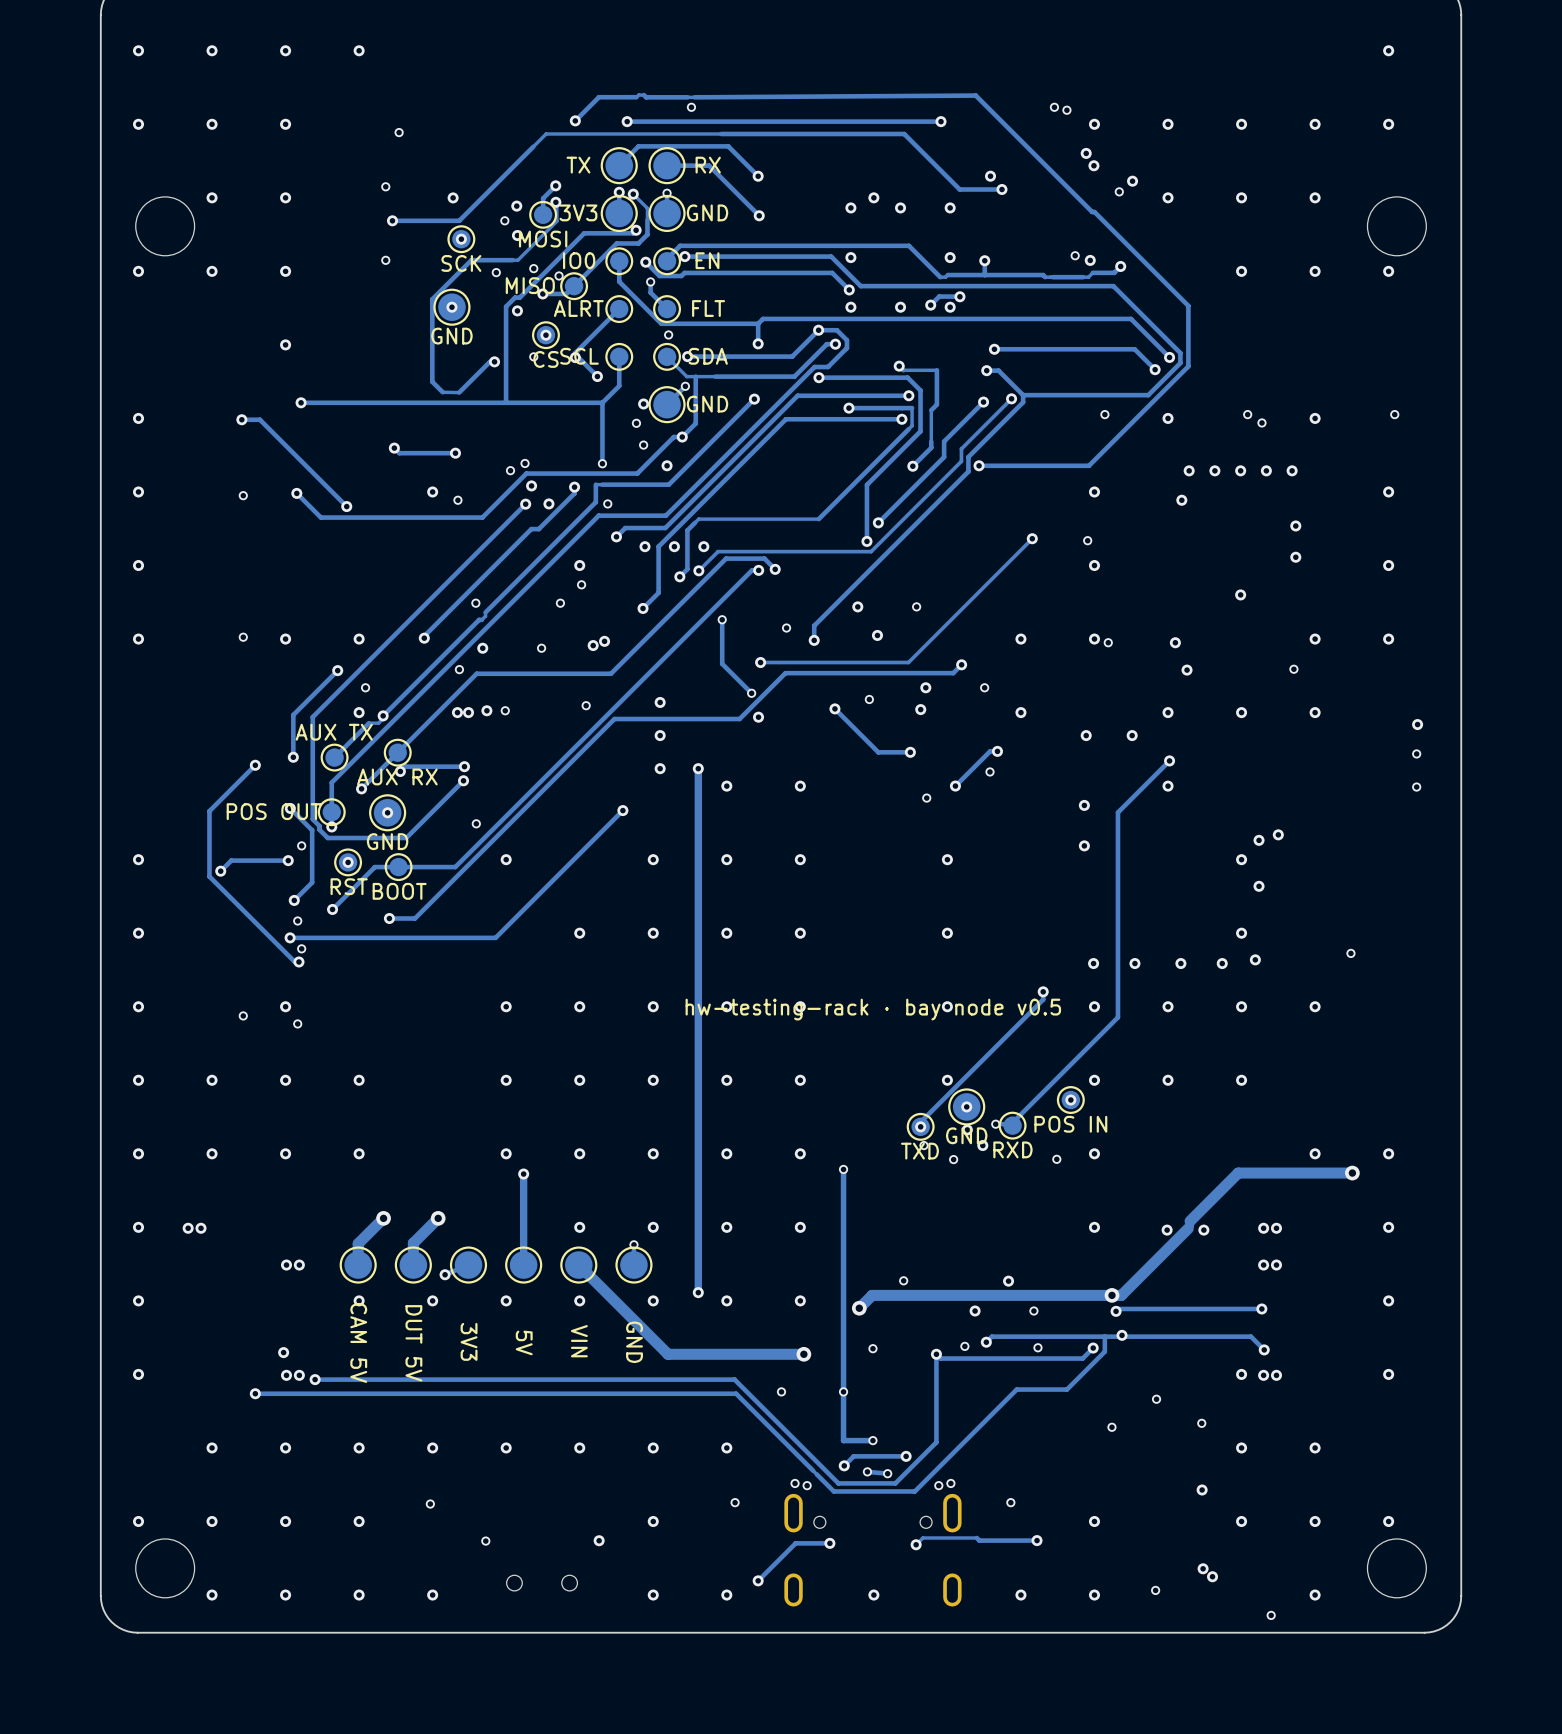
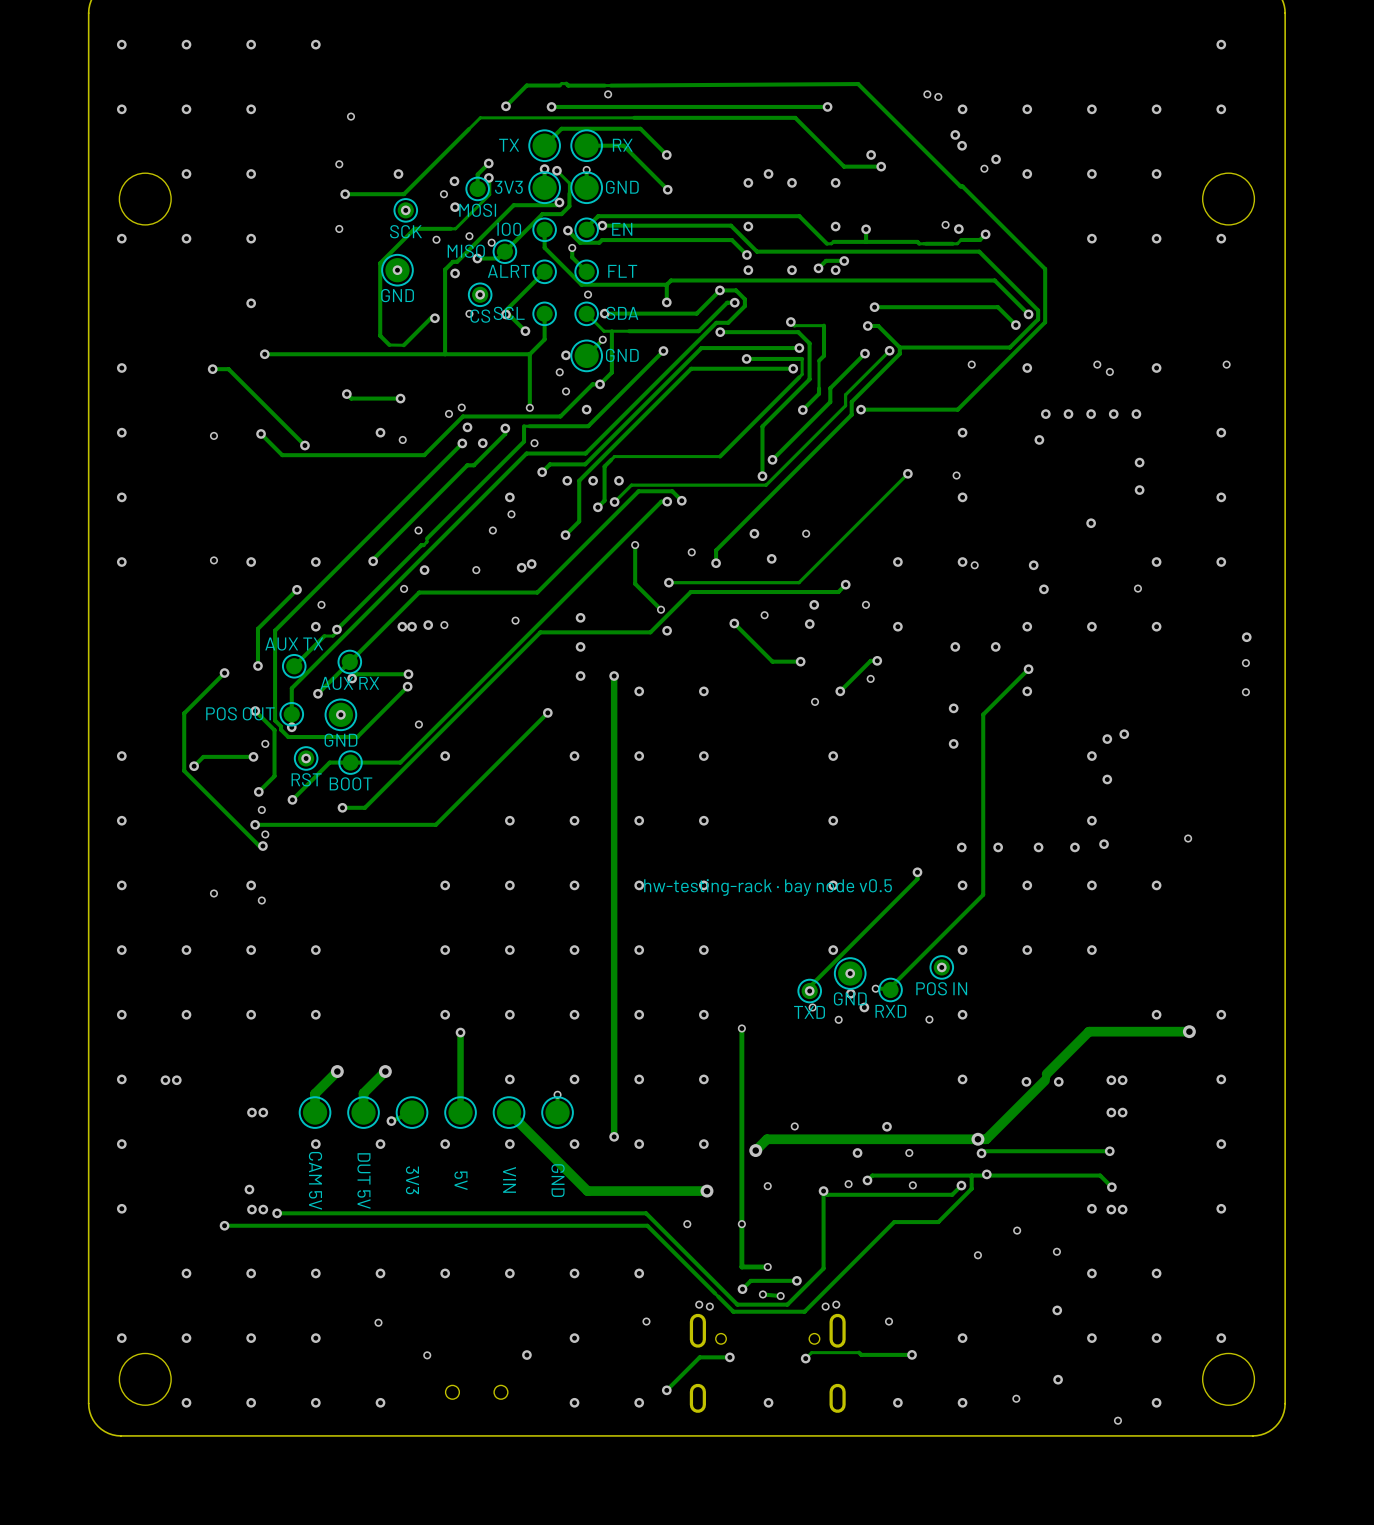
via: (1212, 1576) -> none

